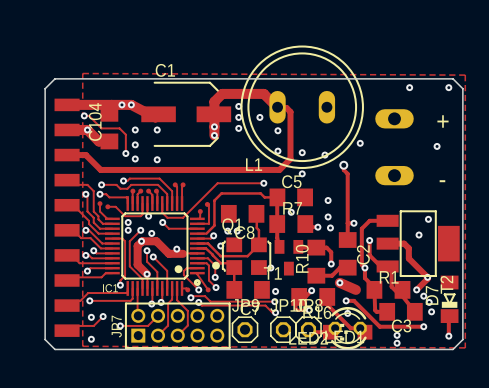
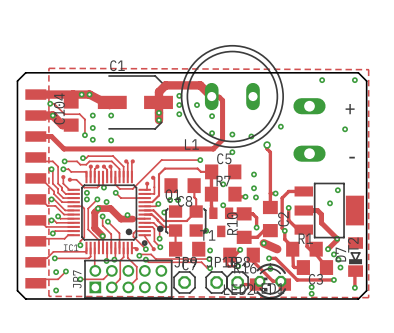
via: none -> (223, 205)

